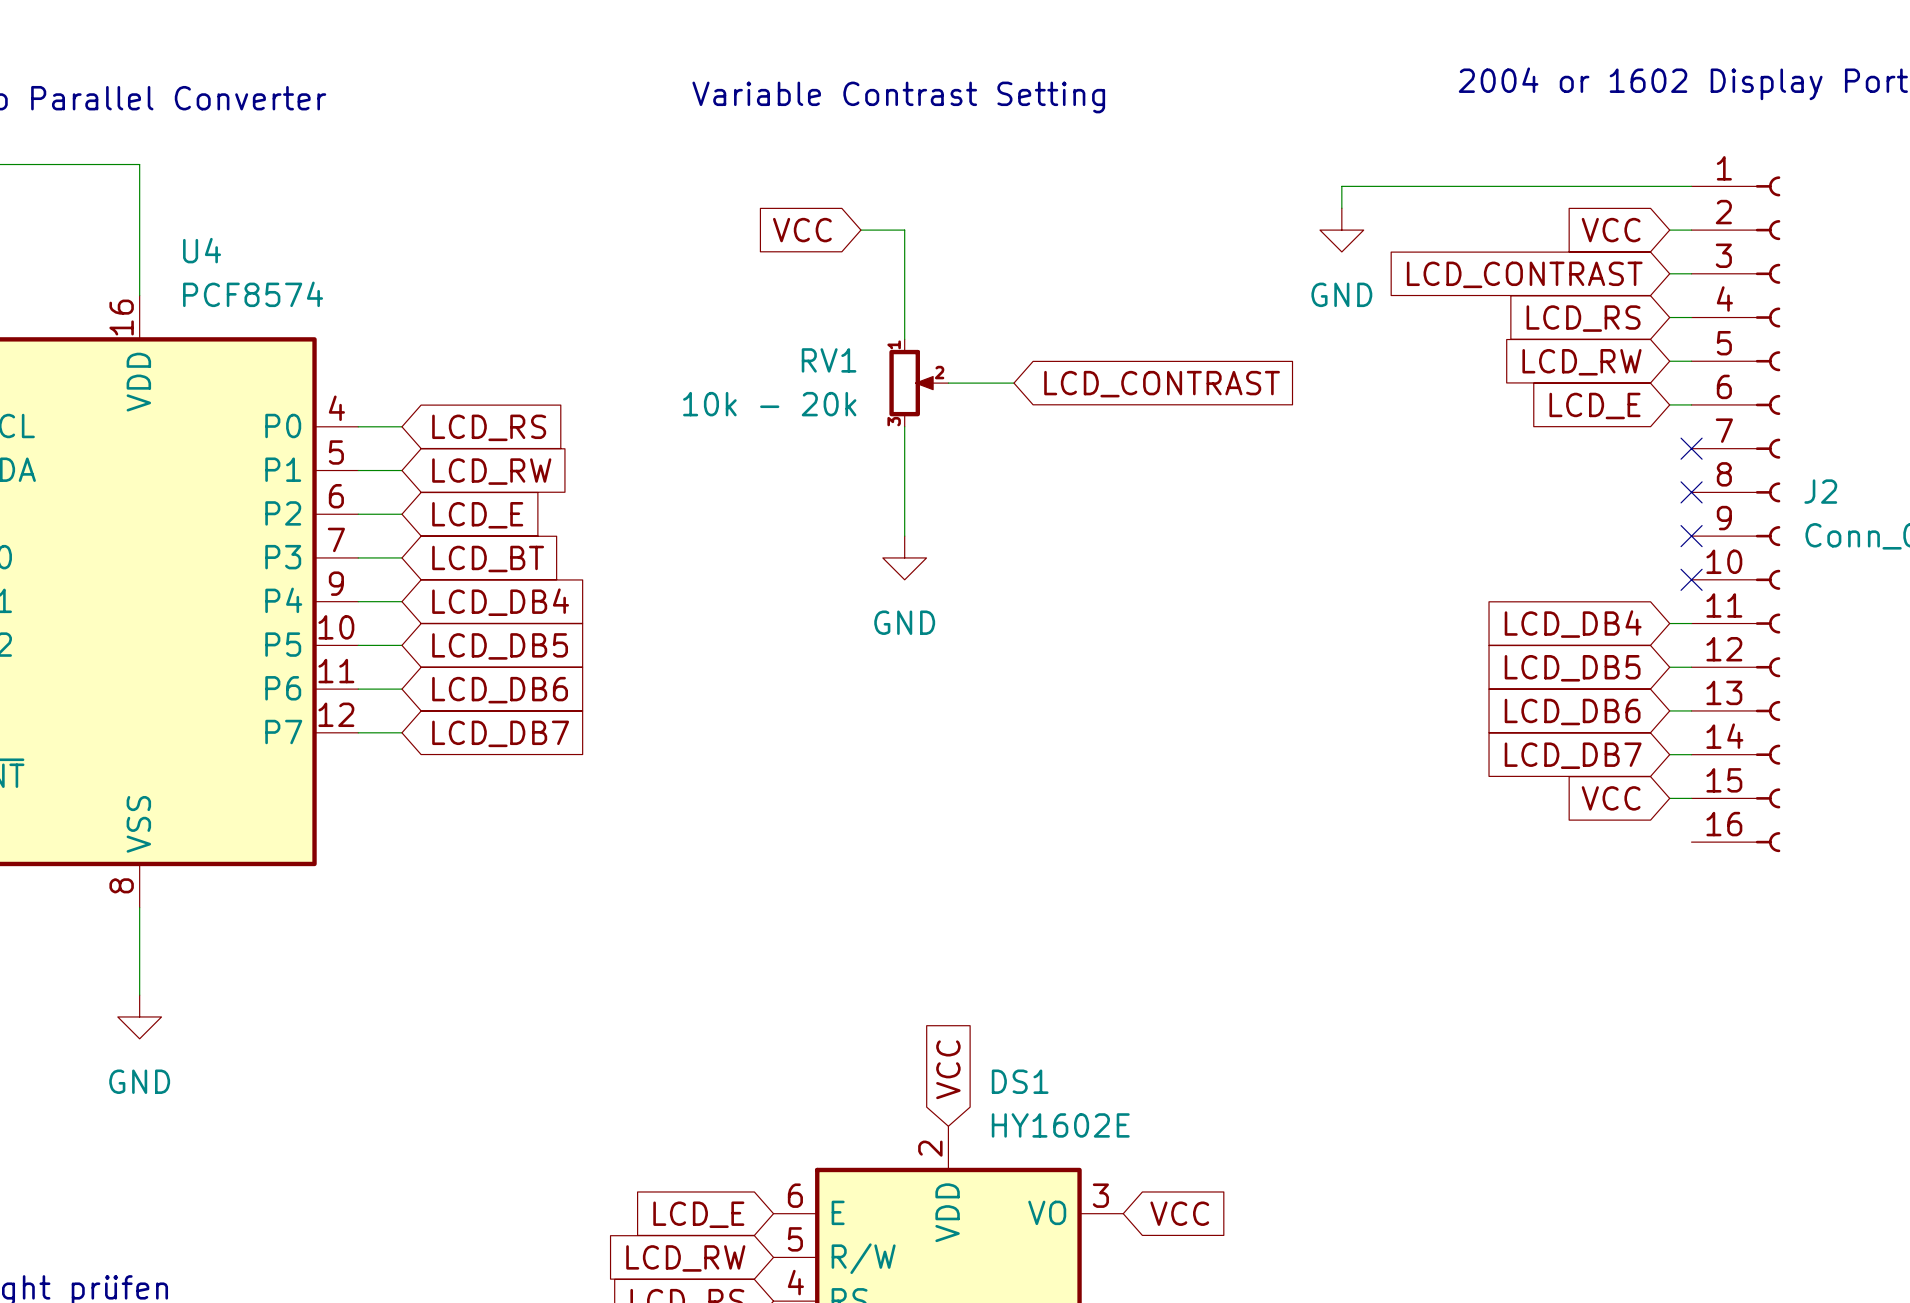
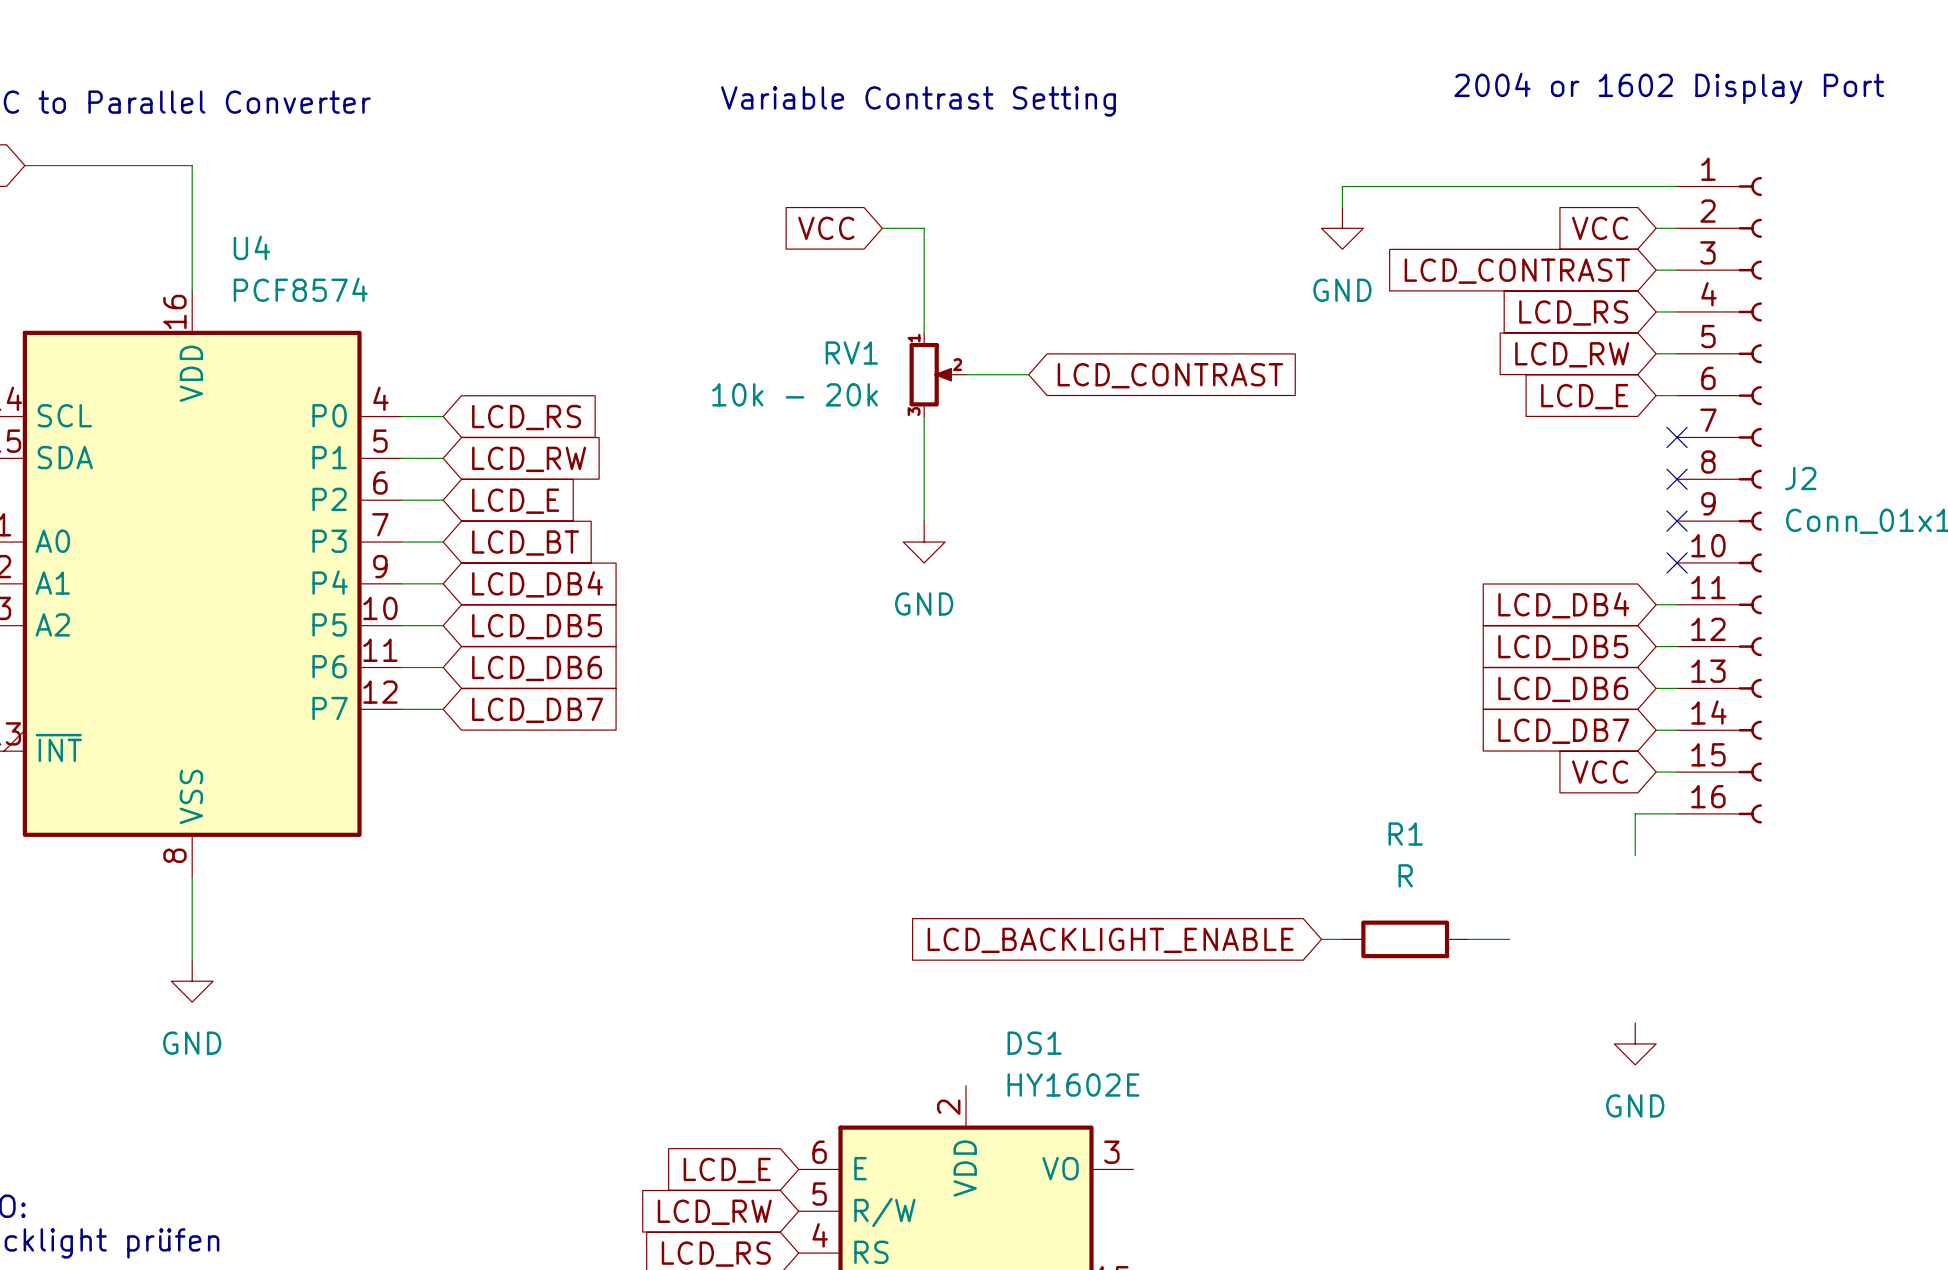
wire: none -> (1677, 813) (1635, 813) (1635, 855)
wire: none -> (1321, 939) (1342, 939)
R1: none -> R (1405, 939)
wire: none -> (1467, 939) (1509, 939)
global label: none -> LCD_BACKLIGHT_ENABLE (1110, 940)
global label: VCC (948, 1069) -> none
power symbol: none -> GND (1635, 1043)
global label: VCC (1179, 1213) -> none

